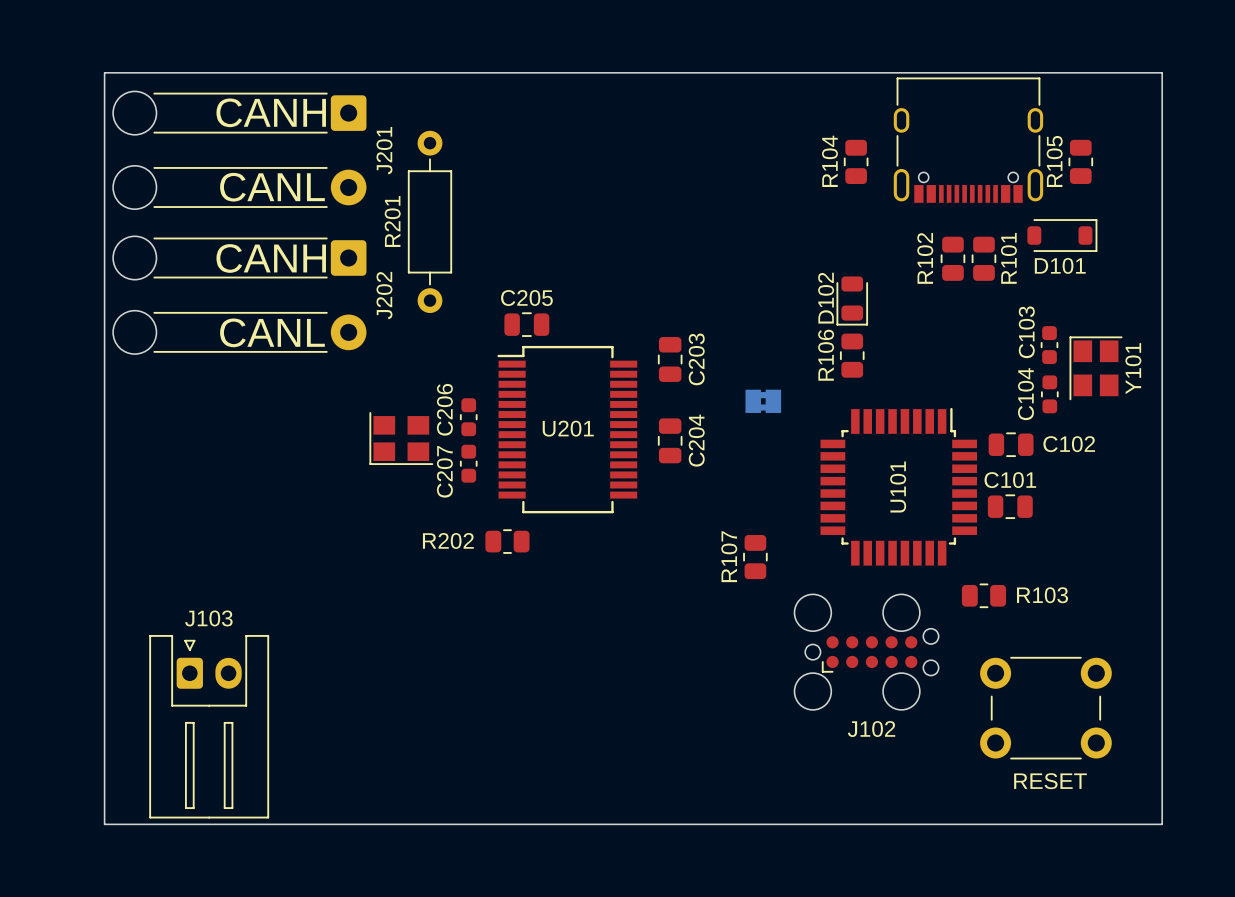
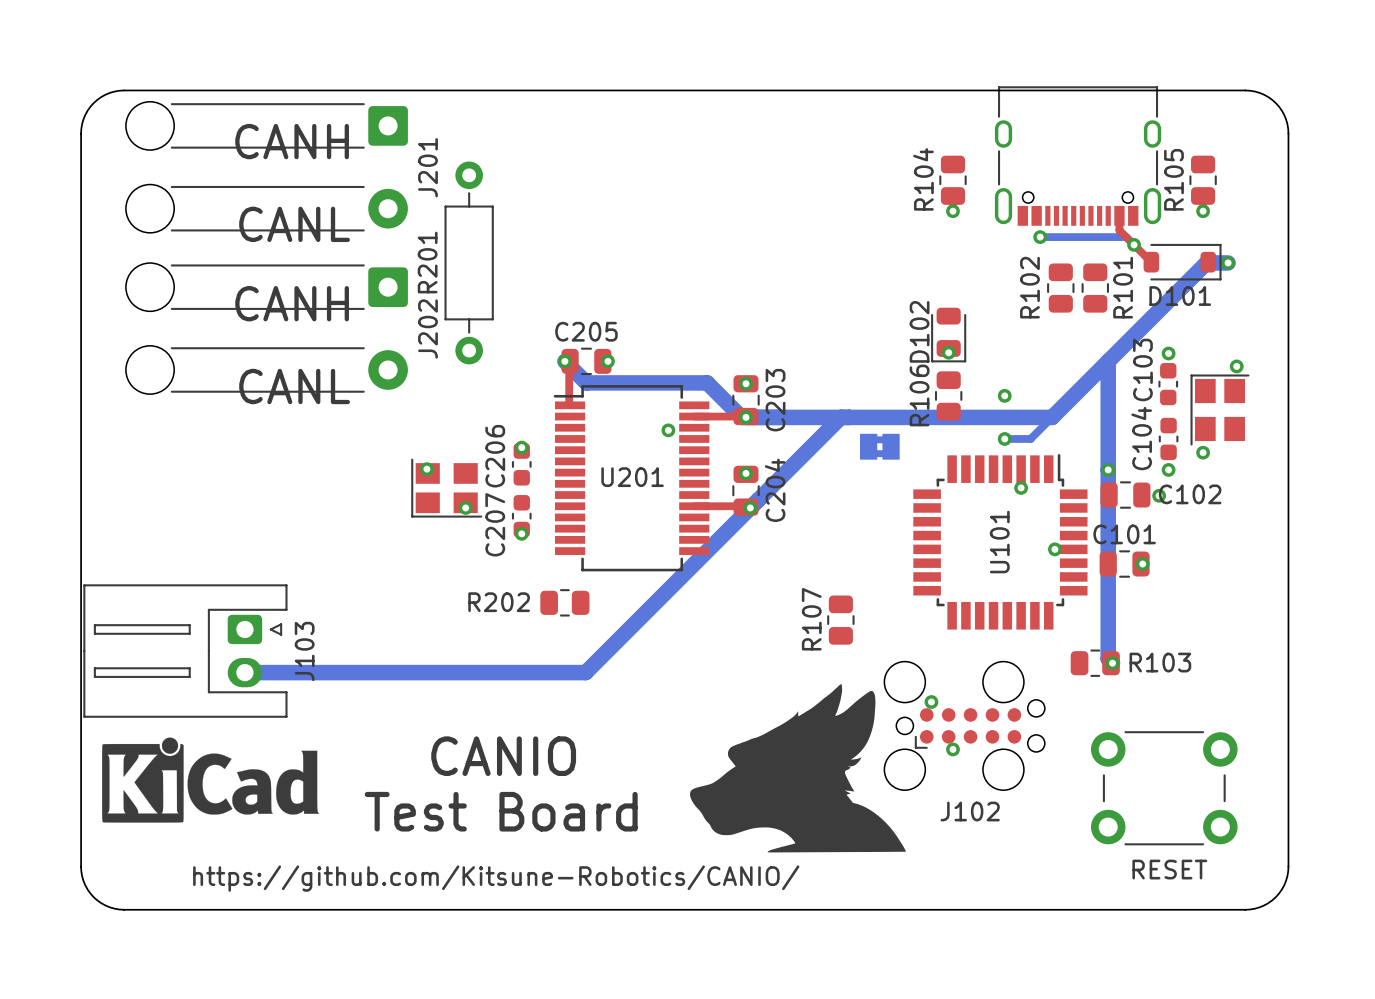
board edge: (104, 72) (1162, 72) (1162, 824) (104, 824) (104, 72) -> (124, 90) (109, 92) (93, 103) (83, 119) (81, 133) (81, 866) (83, 880) (87, 889) (101, 903) (109, 907) (124, 909) (1245, 909) (1259, 907) (1268, 903) (1281, 889) (1286, 880) (1288, 866) (1288, 133) (1286, 119) (1281, 110) (1268, 97) (1259, 92) (1245, 90) (124, 90)
text position: CANH (271, 112) -> CANH (292, 141)
text position: CANL (272, 187) -> CANL (294, 224)
via: none -> (952, 211)
via: none -> (1203, 211)
top track: none -> (1119, 215) (1119, 230) (1151, 262)
bottom track: none -> (1040, 237) (1126, 237) (1134, 244)
via: none -> (1040, 237)
via: none -> (1134, 244)
R201 position: (430, 221) -> (469, 262)
bottom track: none -> (1228, 262) (1206, 262) (1052, 417) (741, 417) (707, 382) (586, 382) (564, 361)
via: none -> (1228, 262)
text position: CANH (271, 258) -> CANH (292, 303)
via: none -> (948, 352)
via: none -> (1168, 353)
via: none -> (564, 361)
top track: none -> (570, 361) (564, 361) (569, 365) (570, 405)
via: none -> (608, 361)
via: none -> (1236, 366)
text position: CANL (272, 332) -> CANL (294, 386)
via: none -> (746, 383)
via: none -> (1004, 395)
Y101 name: Y101 (1133, 368) -> none
top track: none -> (694, 416) (746, 417)
via: none -> (746, 417)
bottom track: none -> (840, 417) (585, 672) (244, 672)
via: none -> (668, 430)
bottom track: none -> (1004, 438) (1030, 438) (1108, 361) (1108, 658) (1112, 663)
via: none -> (1004, 438)
part position: (763, 401) -> (879, 446)
via: none -> (521, 447)
via: none -> (1203, 452)
via: none -> (426, 469)
via: none -> (1108, 469)
via: none -> (1168, 469)
via: none -> (746, 473)
via: none -> (1021, 487)
via: none -> (1159, 495)
top track: none -> (694, 506) (746, 507)
via: none -> (465, 507)
via: none -> (750, 507)
via: none -> (521, 533)
via: none -> (1054, 549)
via: none -> (1142, 564)
via: none -> (1112, 663)
drawing: none -> [690, 684, 906, 853]
via: none -> (931, 702)
drawing: none -> [102, 737, 319, 823]
via: none -> (952, 749)
text: none -> CANIO (503, 756)
J103 rotation: 0° (209, 726) -> 90° clockwise (185, 651)
J103 position: (209, 726) -> (185, 651)
text: none -> Test Board (501, 811)
text: none -> https://github.com/Kitsune-Robotics/CANIO/ (496, 878)

